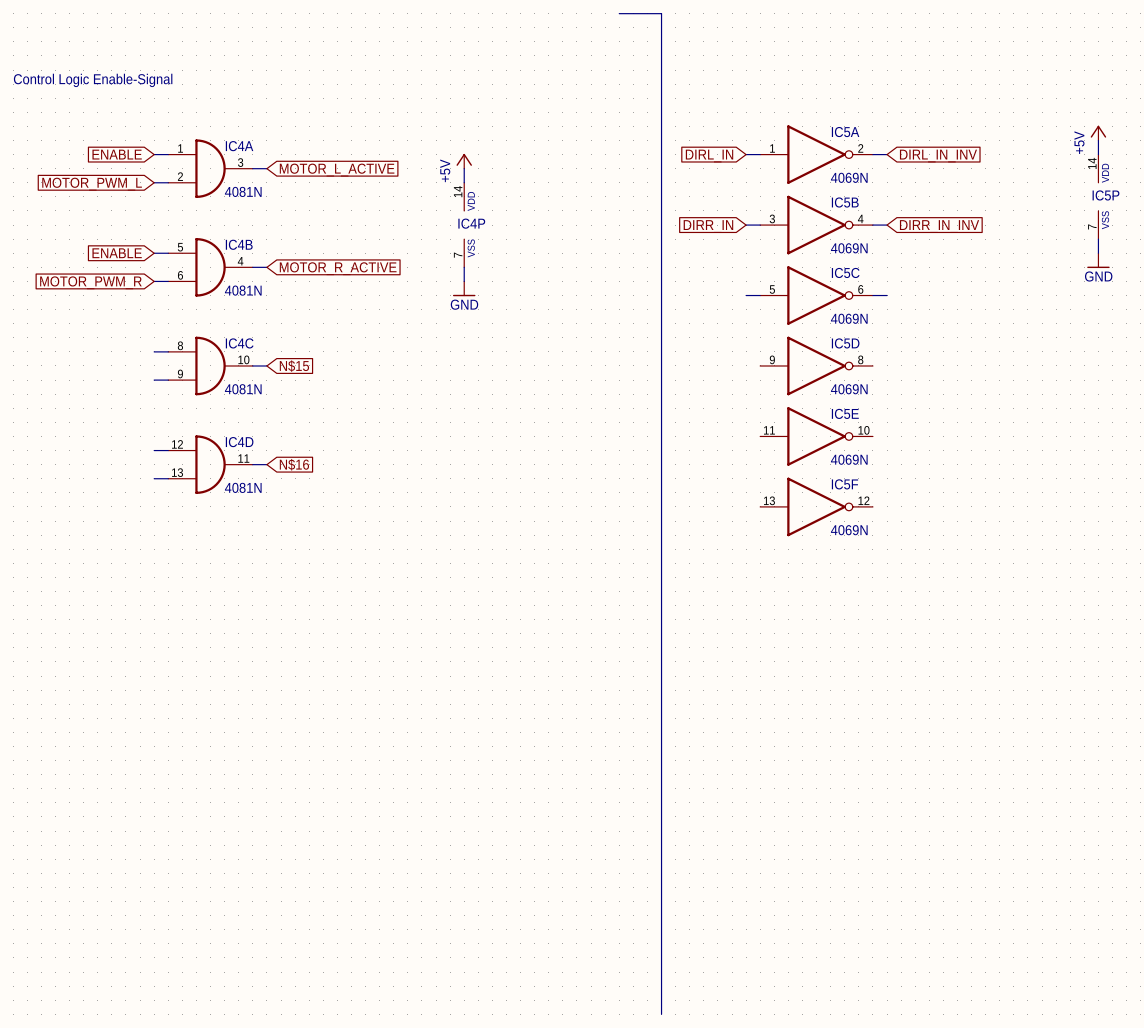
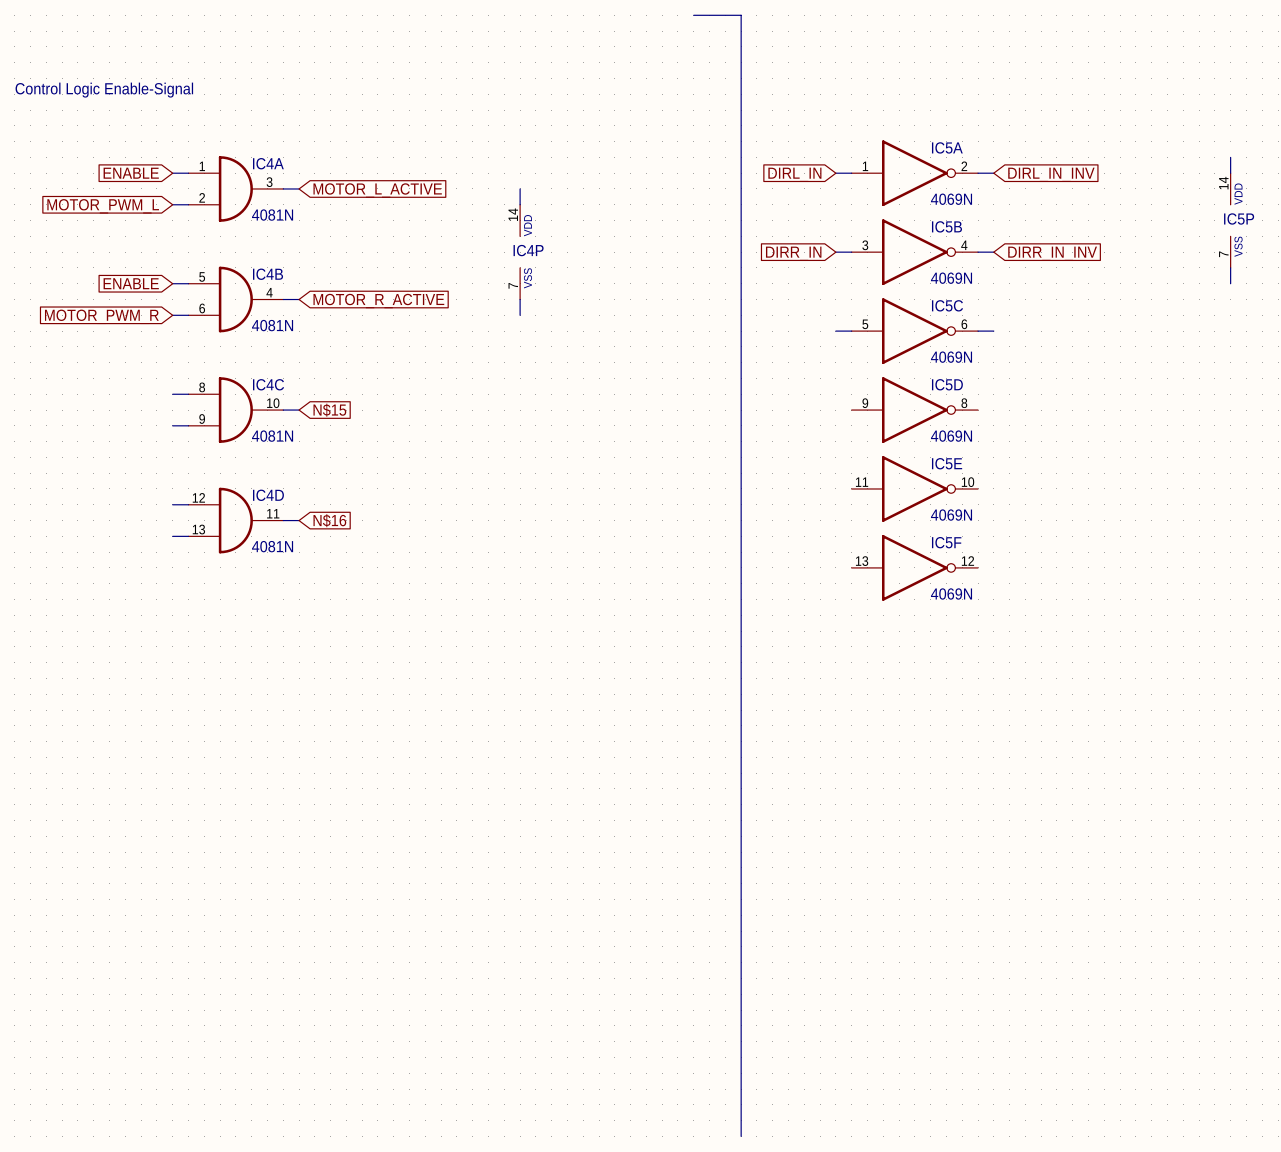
power symbol: +5V (1098, 133) -> none
power symbol: +5V (464, 161) -> none
power symbol: GND (1098, 260) -> none
power symbol: GND (464, 288) -> none

